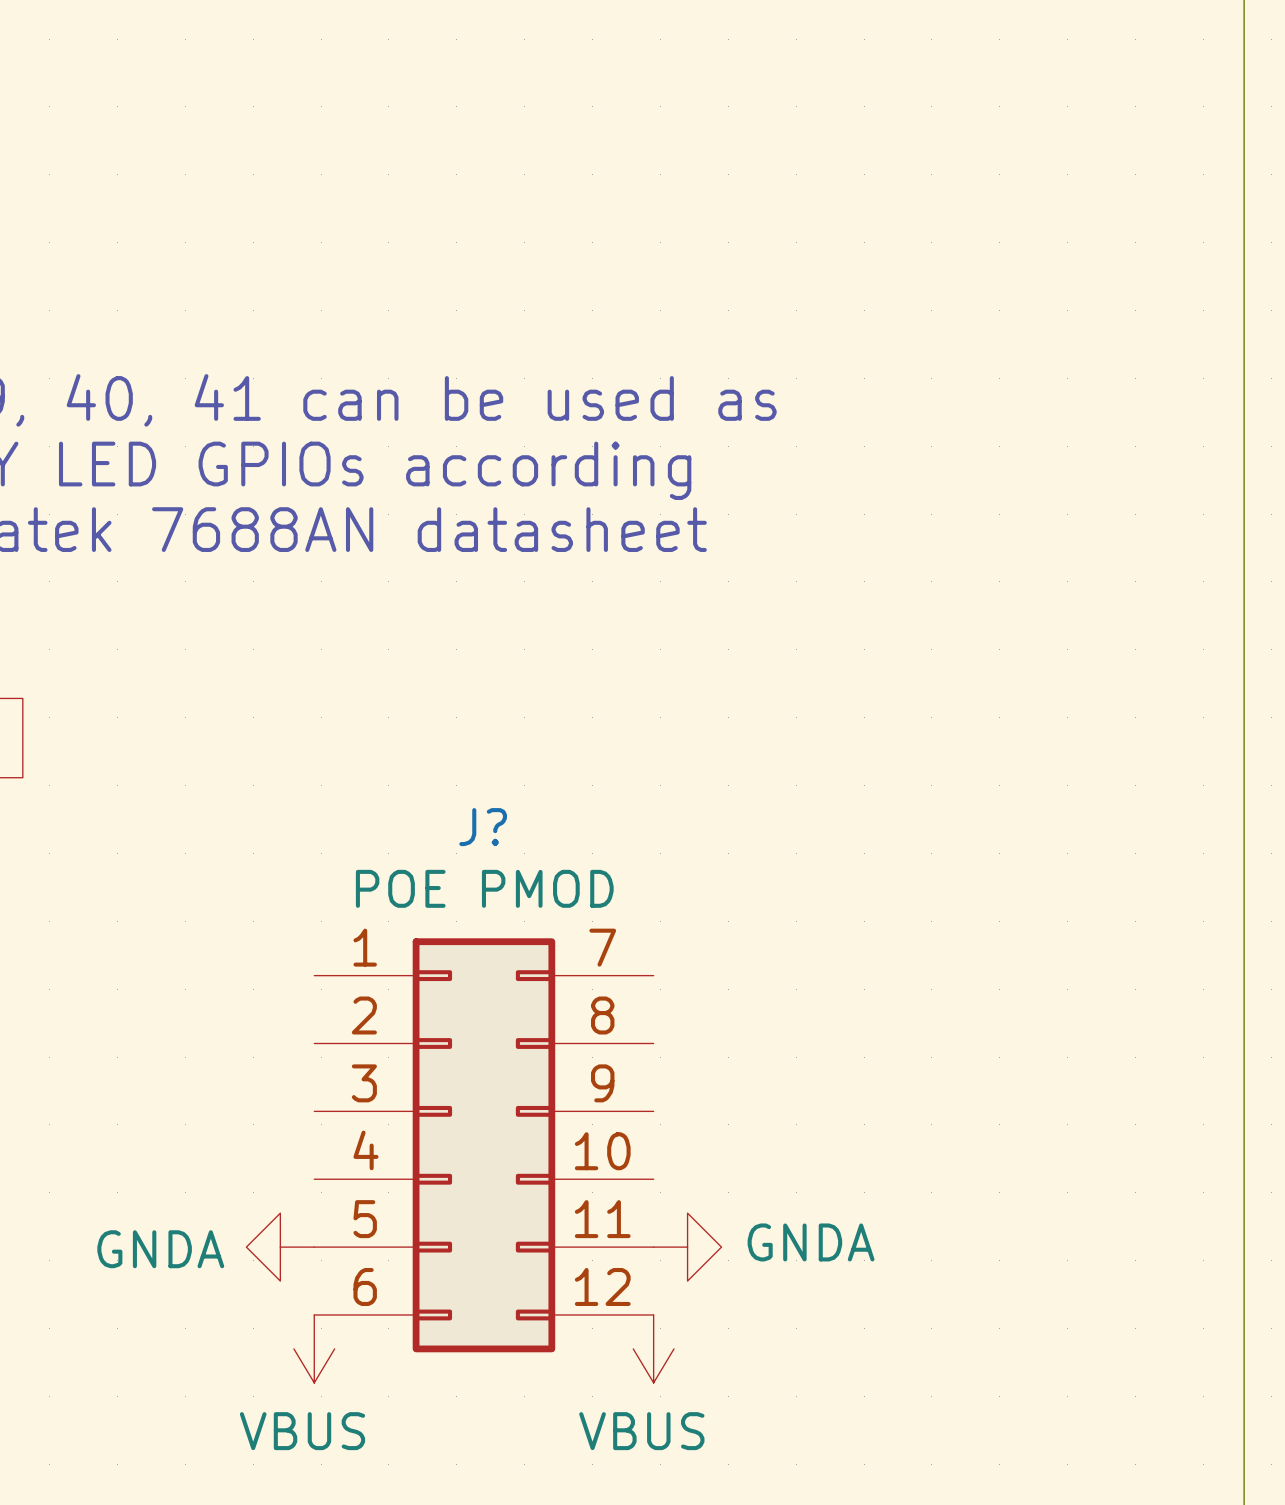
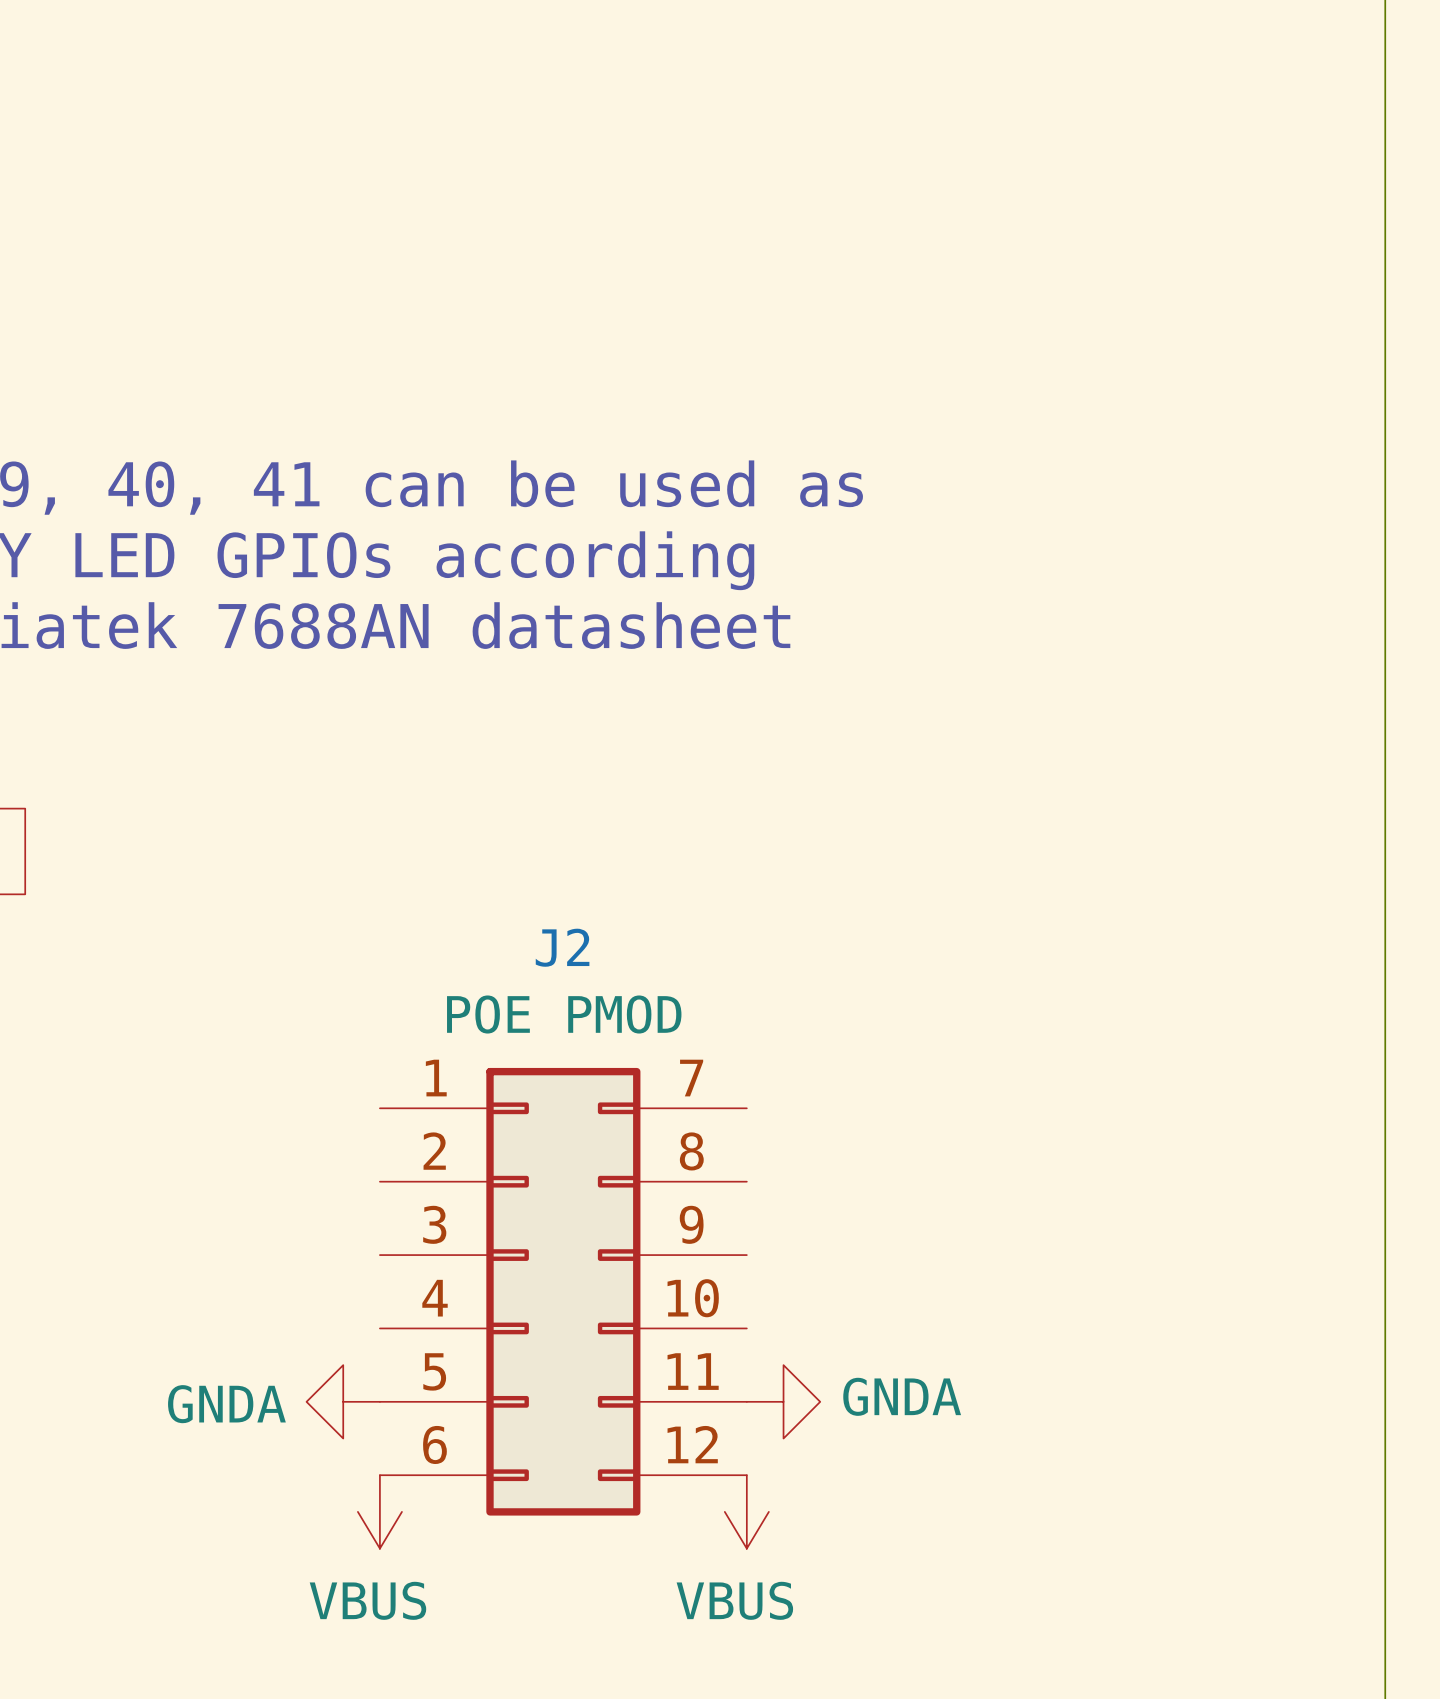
J? name: J? (483, 827) -> J2 (562, 947)

